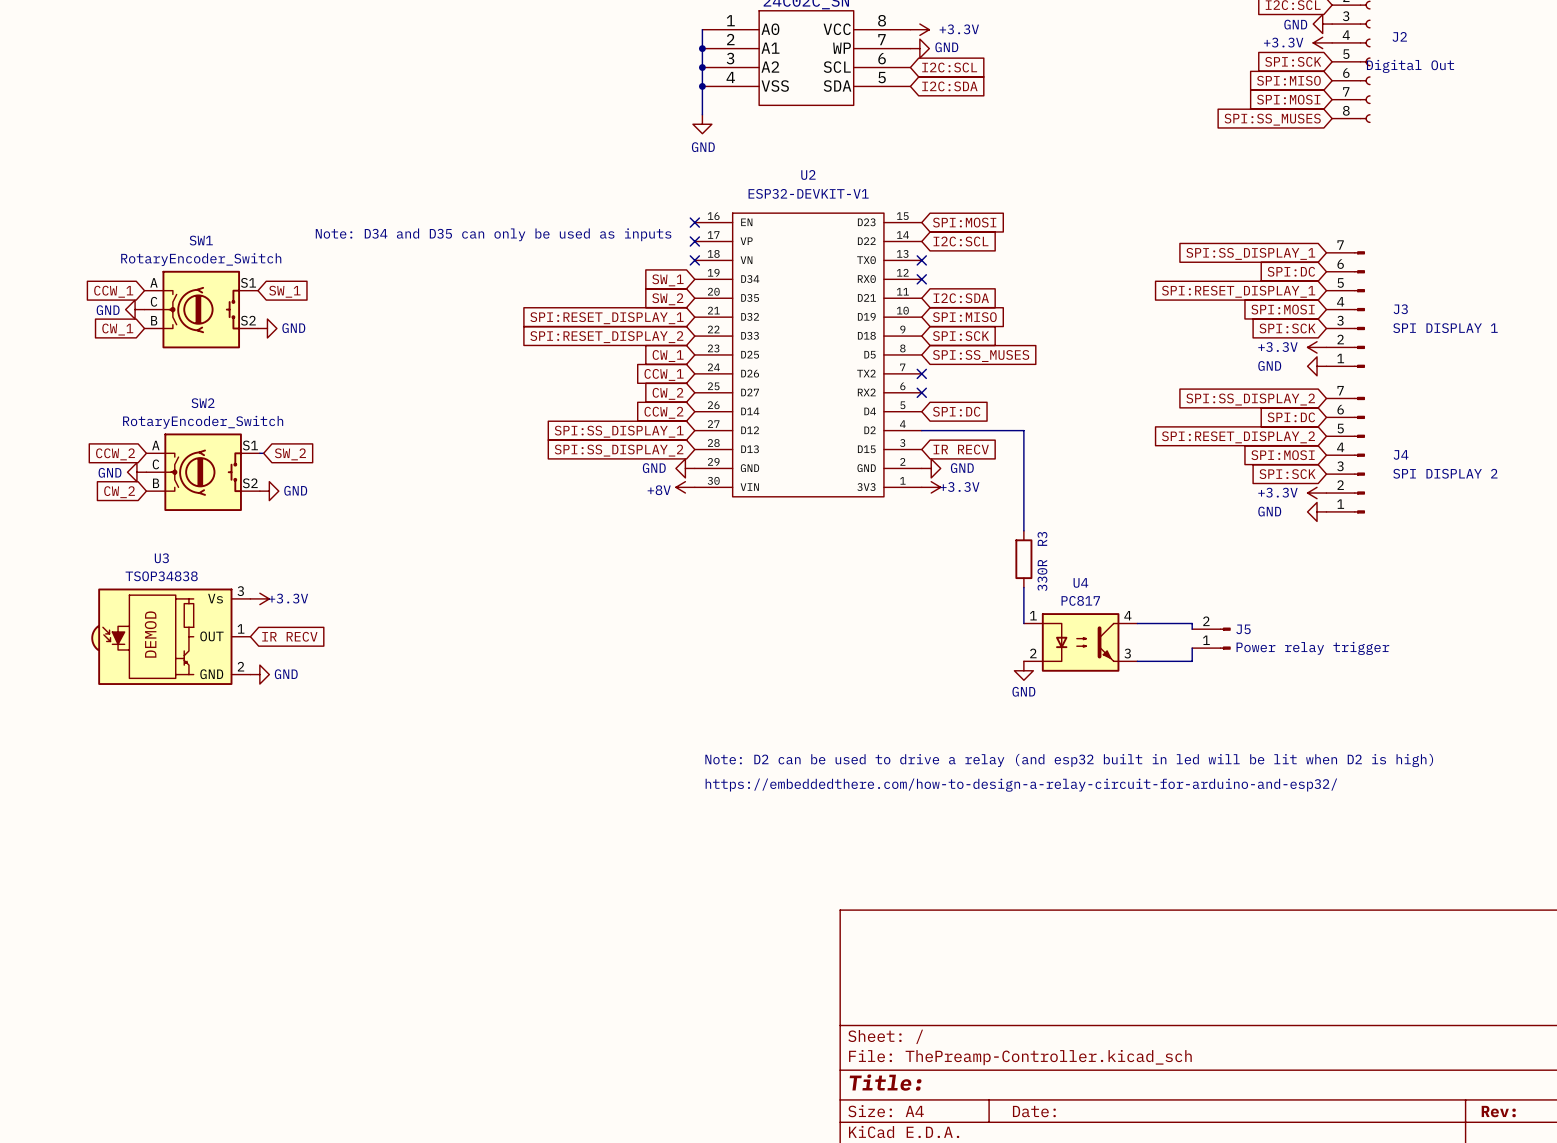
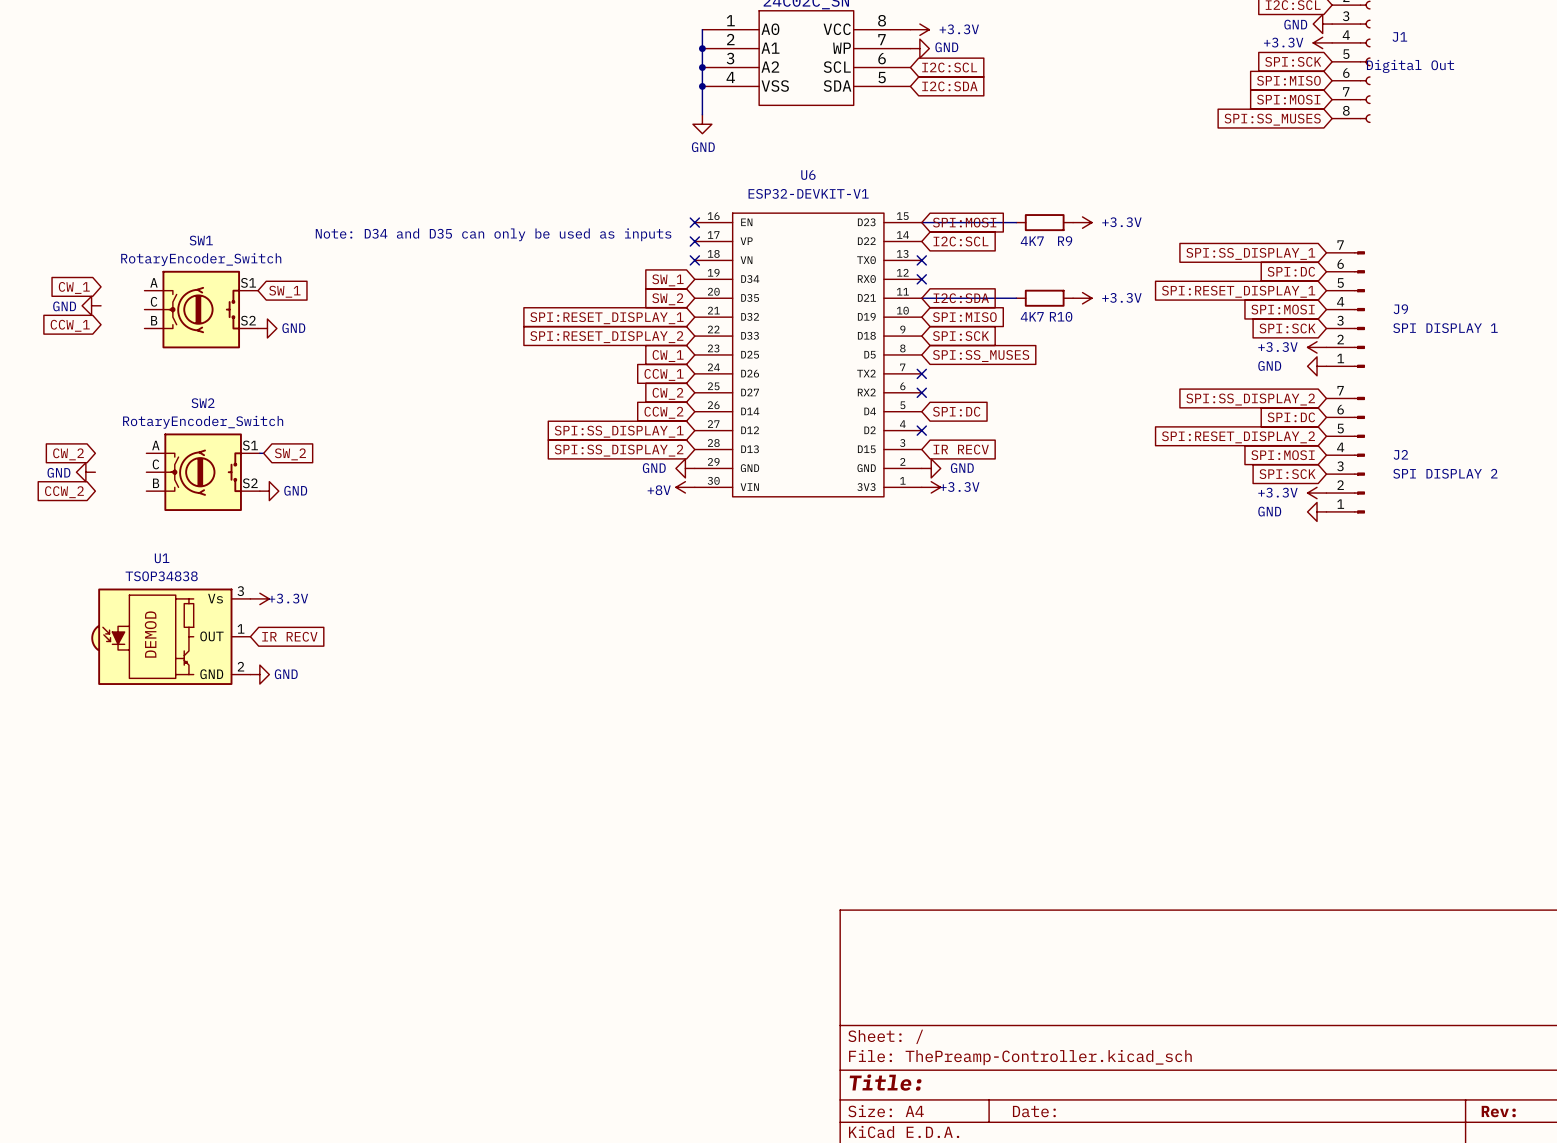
J2 name: J2 (1399, 36) -> J1 (1399, 36)
U2 name: U2 (808, 174) -> U6 (808, 175)
wire: none -> (921, 222) (1016, 222)
R9: none -> 4K7 (1044, 222)
power symbol: none -> +3.3V (1082, 222)
global label position: CCW_1 (113, 291) -> CCW_1 (70, 325)
wire: none -> (921, 298) (1016, 298)
R10: none -> 4K7 (1044, 298)
power symbol: none -> +3.3V (1082, 298)
power symbol position: GND (135, 309) -> GND (91, 305)
J3 name: J3 (1400, 309) -> J9 (1400, 309)
global label position: CW_1 (117, 329) -> CW_1 (74, 287)
wire: (921, 430) (1023, 430) (1023, 530) -> none
no-connect mark: none -> (921, 430)
global label position: CCW_2 (115, 454) -> CCW_2 (64, 492)
J4 name: J4 (1401, 454) -> J2 (1400, 454)
power symbol position: GND (136, 472) -> GND (85, 472)
global label position: CW_2 (119, 492) -> CW_2 (68, 454)
U3 name: U3 (161, 558) -> U1 (162, 558)
R3: 330R (1023, 559) -> none
wire: (1023, 587) (1023, 623) -> none
wire: (1137, 623) (1192, 623) (1192, 629) -> none
J5: Power relay trigger (1211, 638) -> none
U4: PC817 (1080, 642) -> none
wire: (1192, 648) (1192, 661) (1137, 661) -> none
power symbol: GND (1023, 670) -> none
text: Note: D2 can be used to drive a relay (and esp32 built in led will be lit when D2 is high) (1069, 760) -> none
text: https://embeddedthere.com/how-to-design-a-relay-circuit-for-arduino-and-esp32/ (1021, 785) -> none

